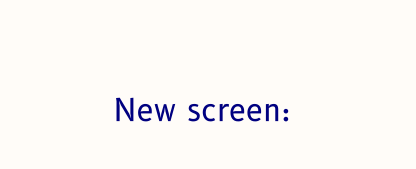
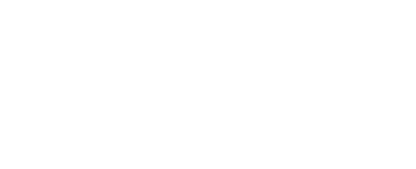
text: New screen: (202, 109) -> none

